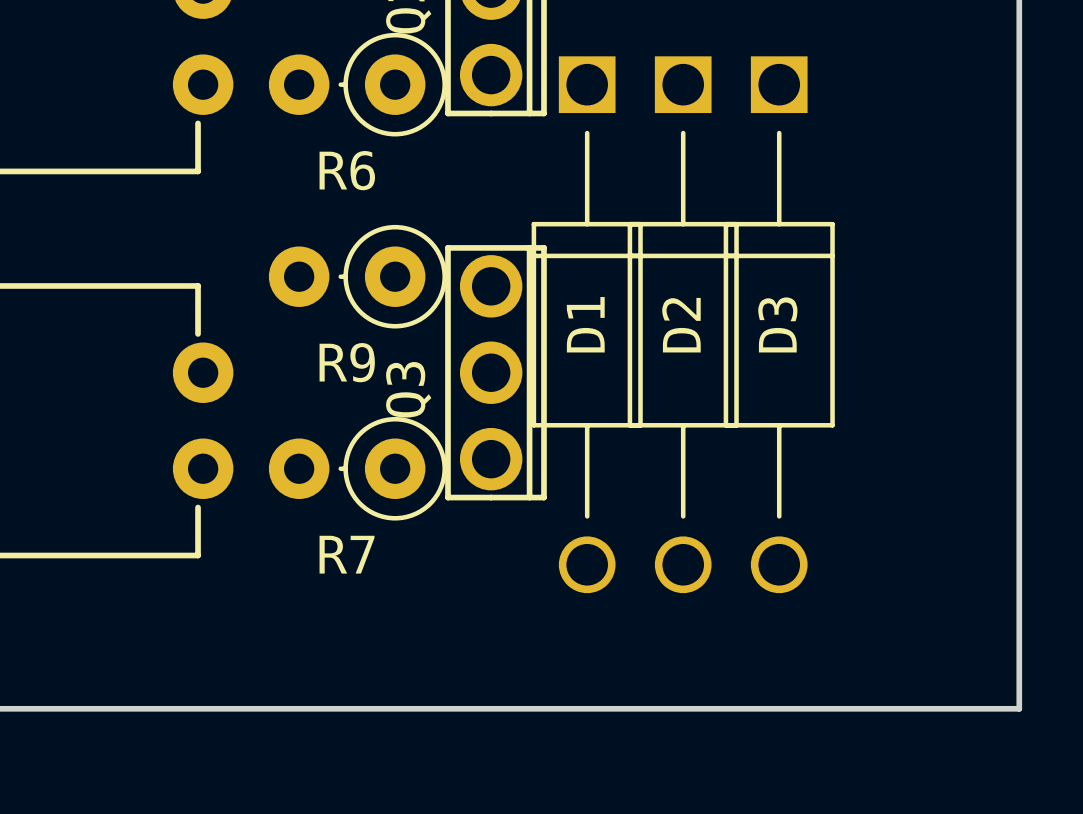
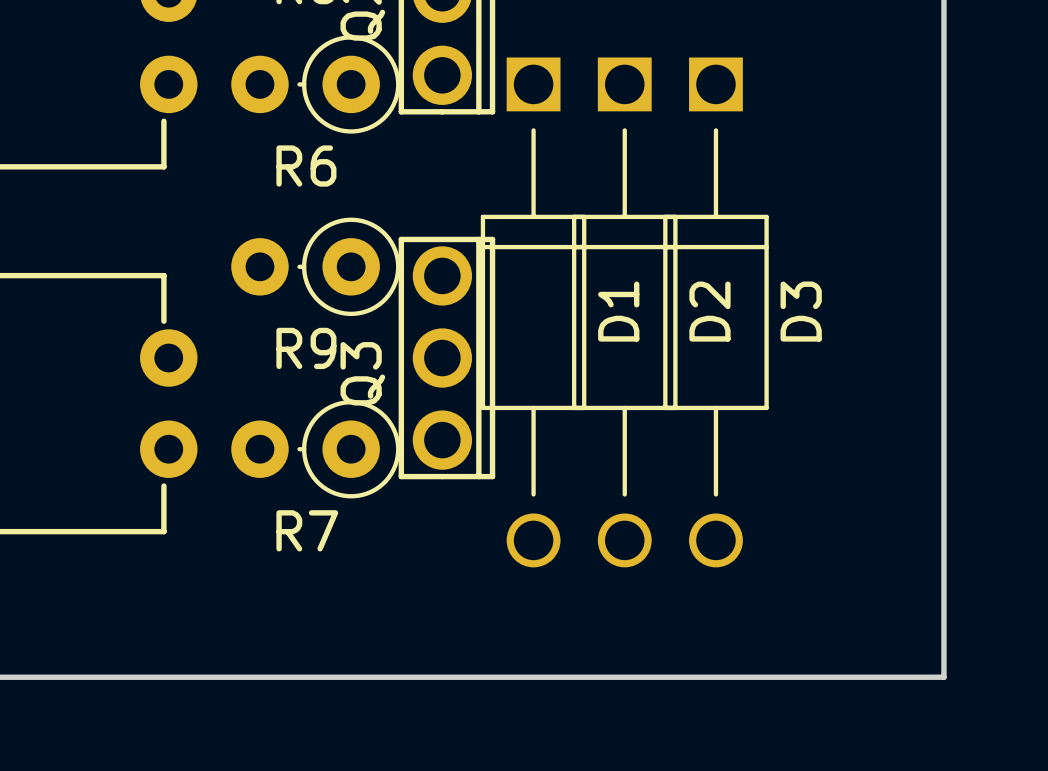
D1 name position: D1 (585, 324) -> D1 (618, 311)
D3 name position: D3 (777, 324) -> D3 (801, 311)
D2 name position: D2 (681, 325) -> D2 (709, 311)

